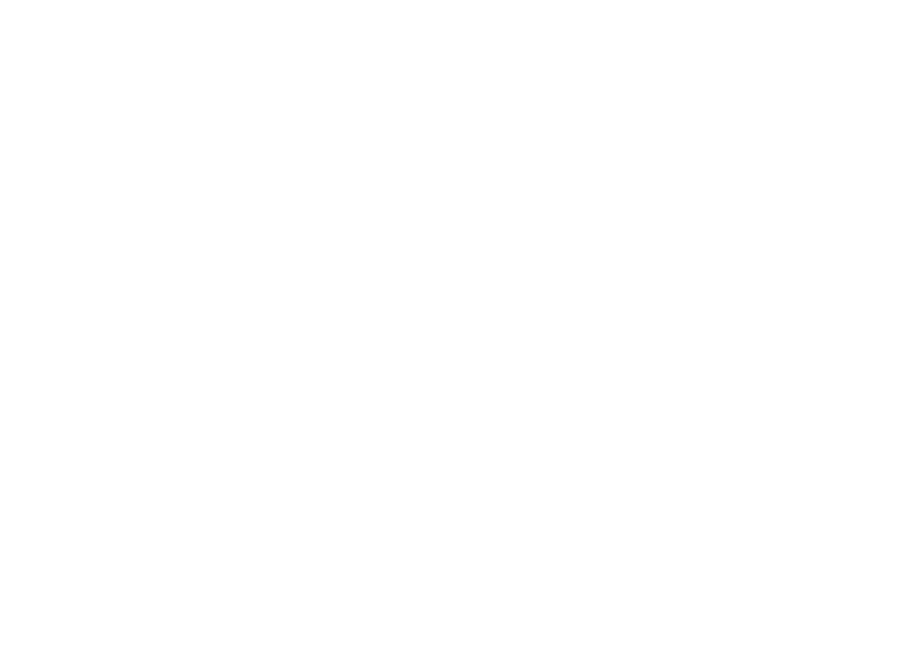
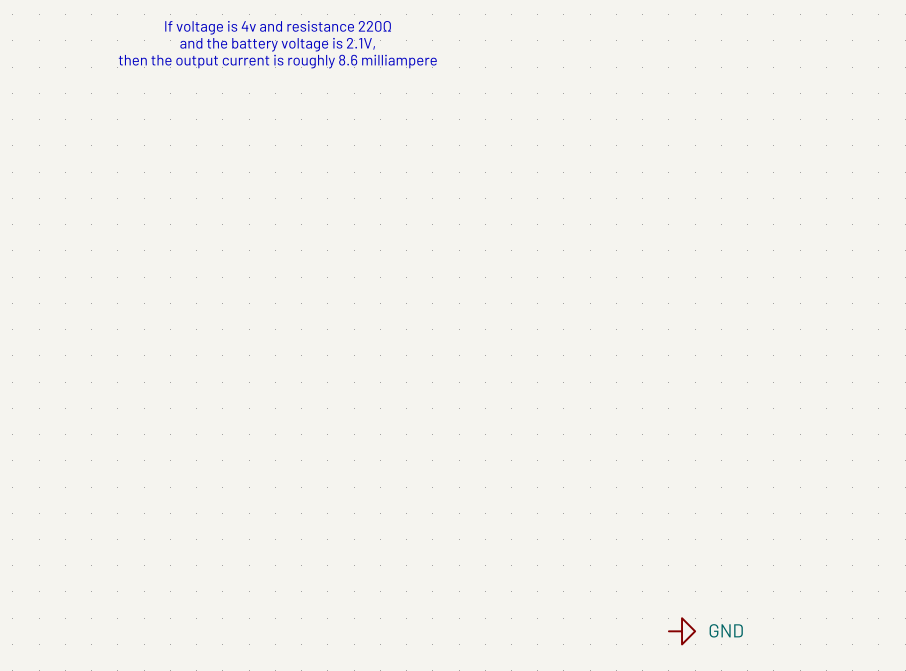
text: none -> If voltage is 4v and resistance 220Ω (278, 27)
text: none -> and the battery voltage is 2.1V, (277, 44)
text: none -> then the output current is roughly 8.6 milliampere (277, 61)
power symbol: none -> GND (682, 631)

